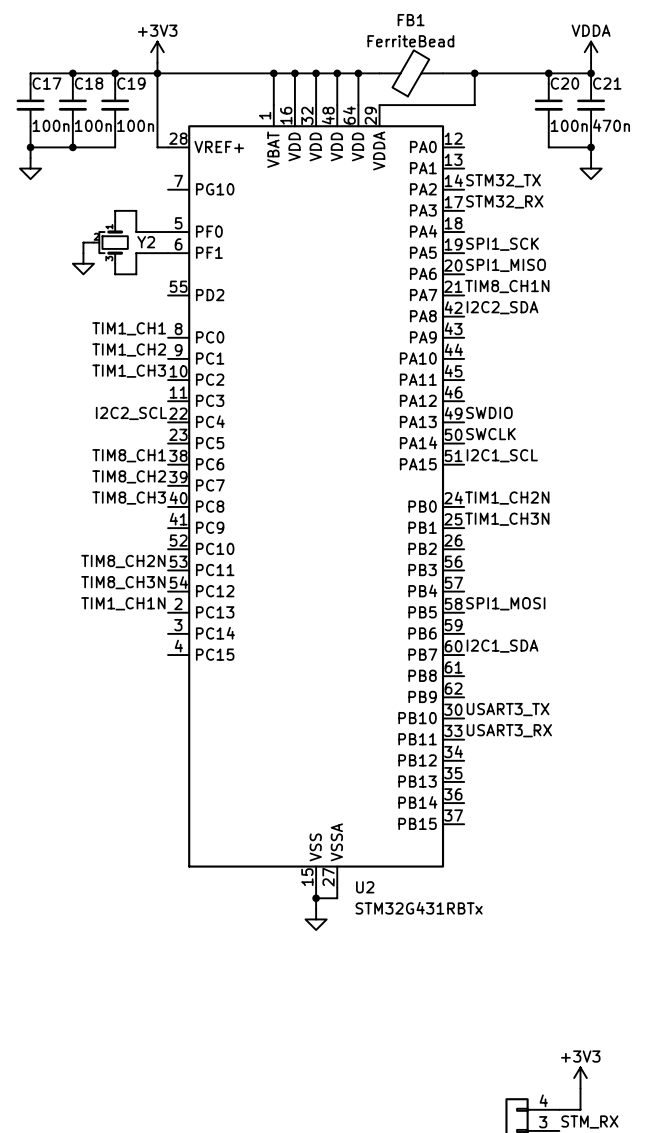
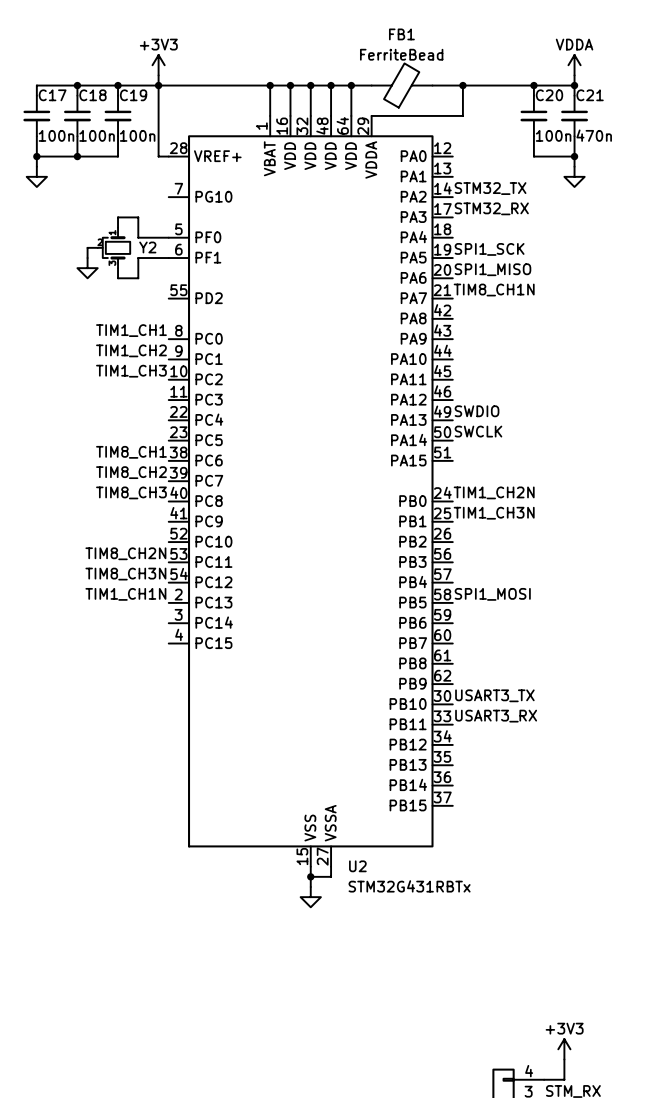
label: I2C2_SDA (502, 307) -> none
label: I2C2_SCL (131, 413) -> none
label: I2C1_SCL (502, 455) -> none
label: I2C1_SDA (502, 646) -> none

